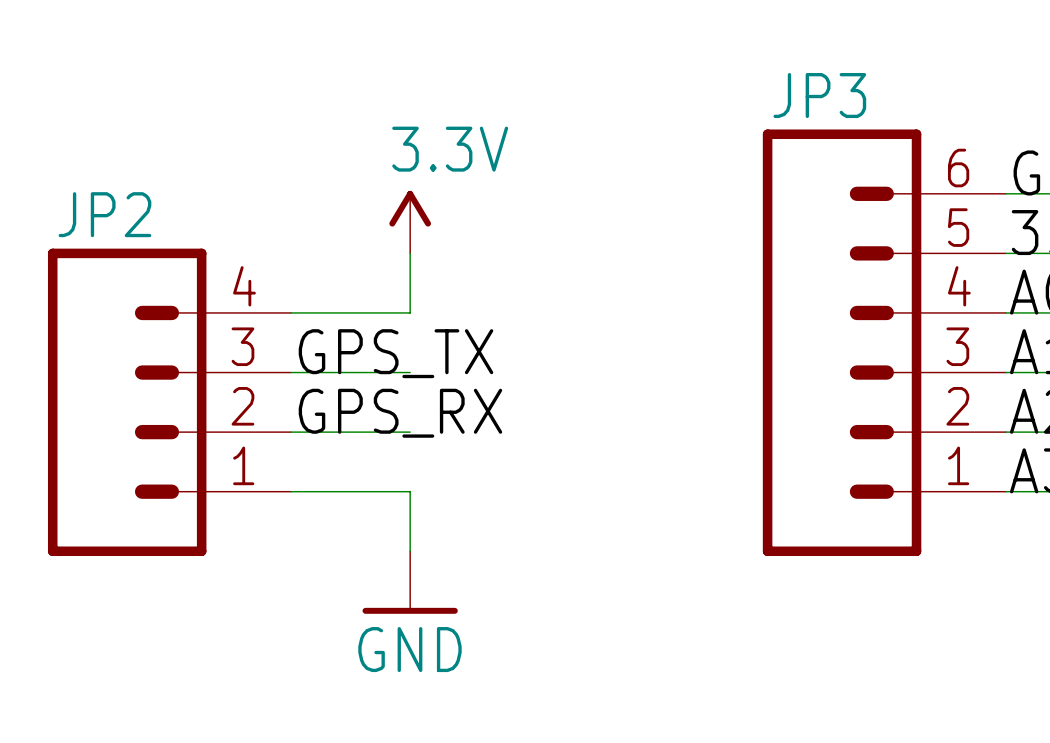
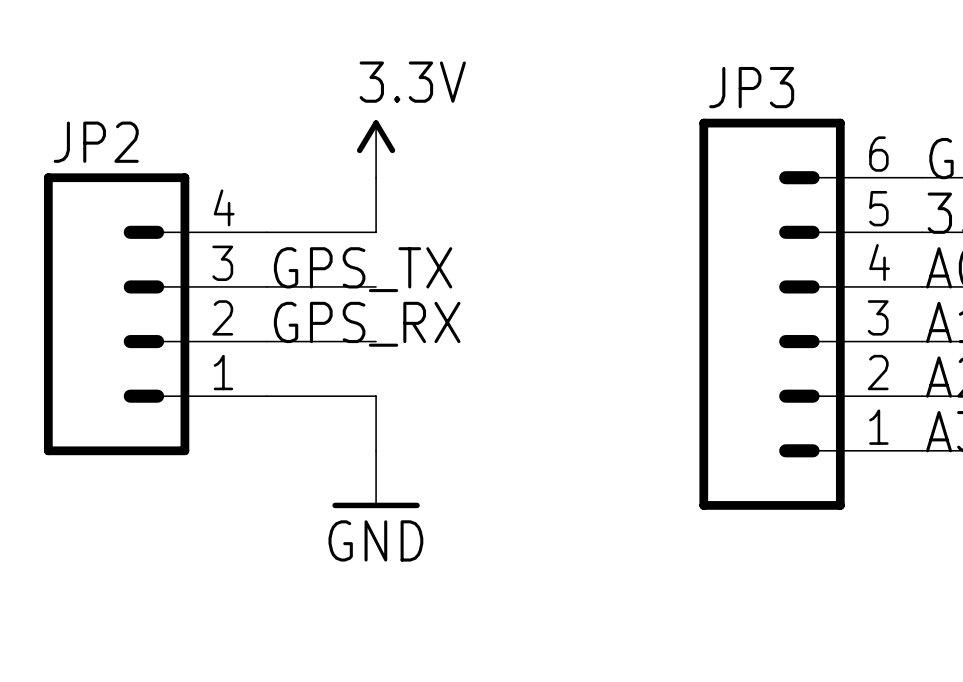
wire: none -> (376, 177) (376, 232) (266, 232)
power symbol position: 3.3V (410, 222) -> 3.3V (376, 149)
wire: (410, 253) (410, 312) -> (376, 396) (376, 450)
label: none -> GPS_TX (363, 269)
label: GPS_TX (395, 353) -> GPS_RX (367, 324)
JP2 position: (169, 402) -> (155, 314)
label: GPS_RX (400, 413) -> none
wire: (291, 491) (410, 491) (410, 551) -> none
power symbol position: GND (410, 582) -> GND (376, 479)

